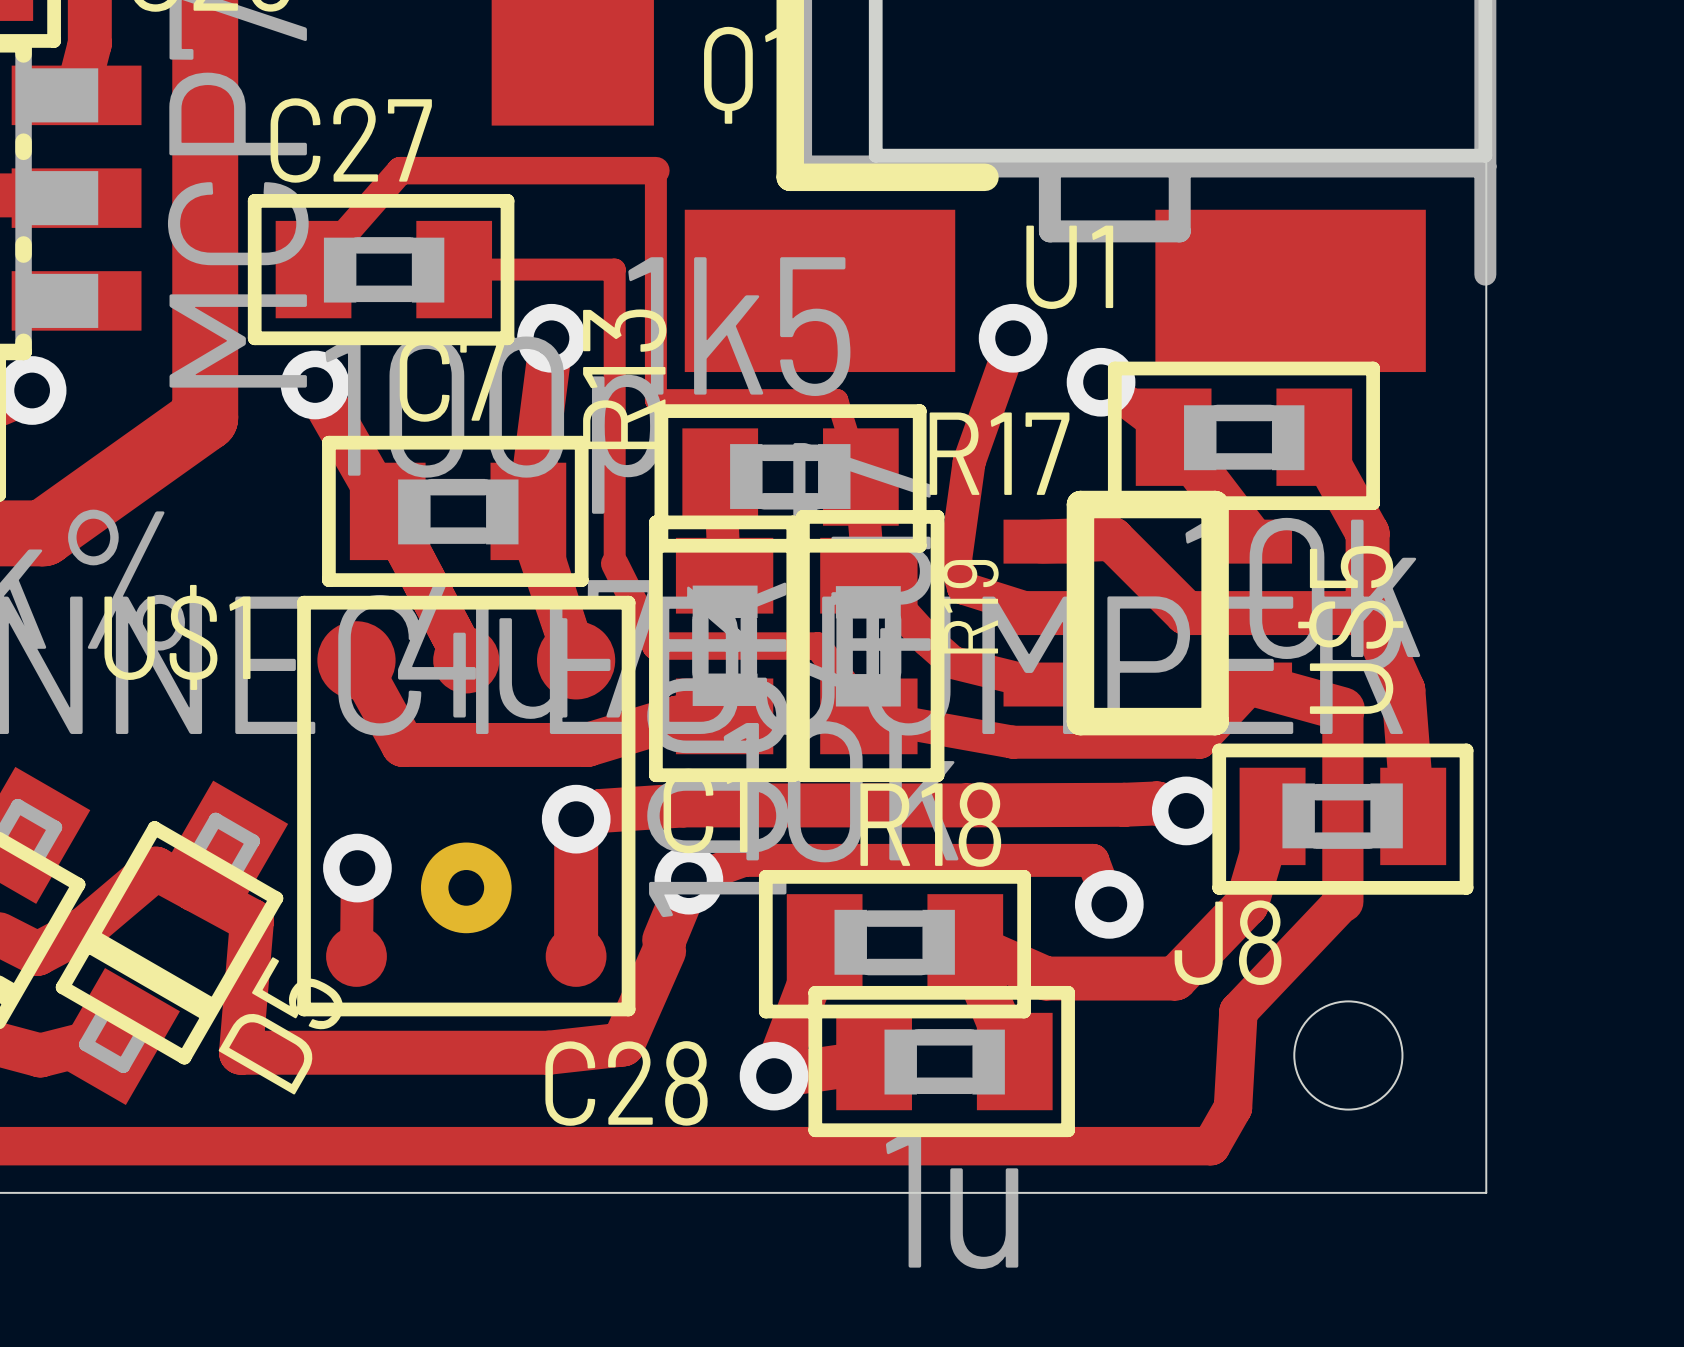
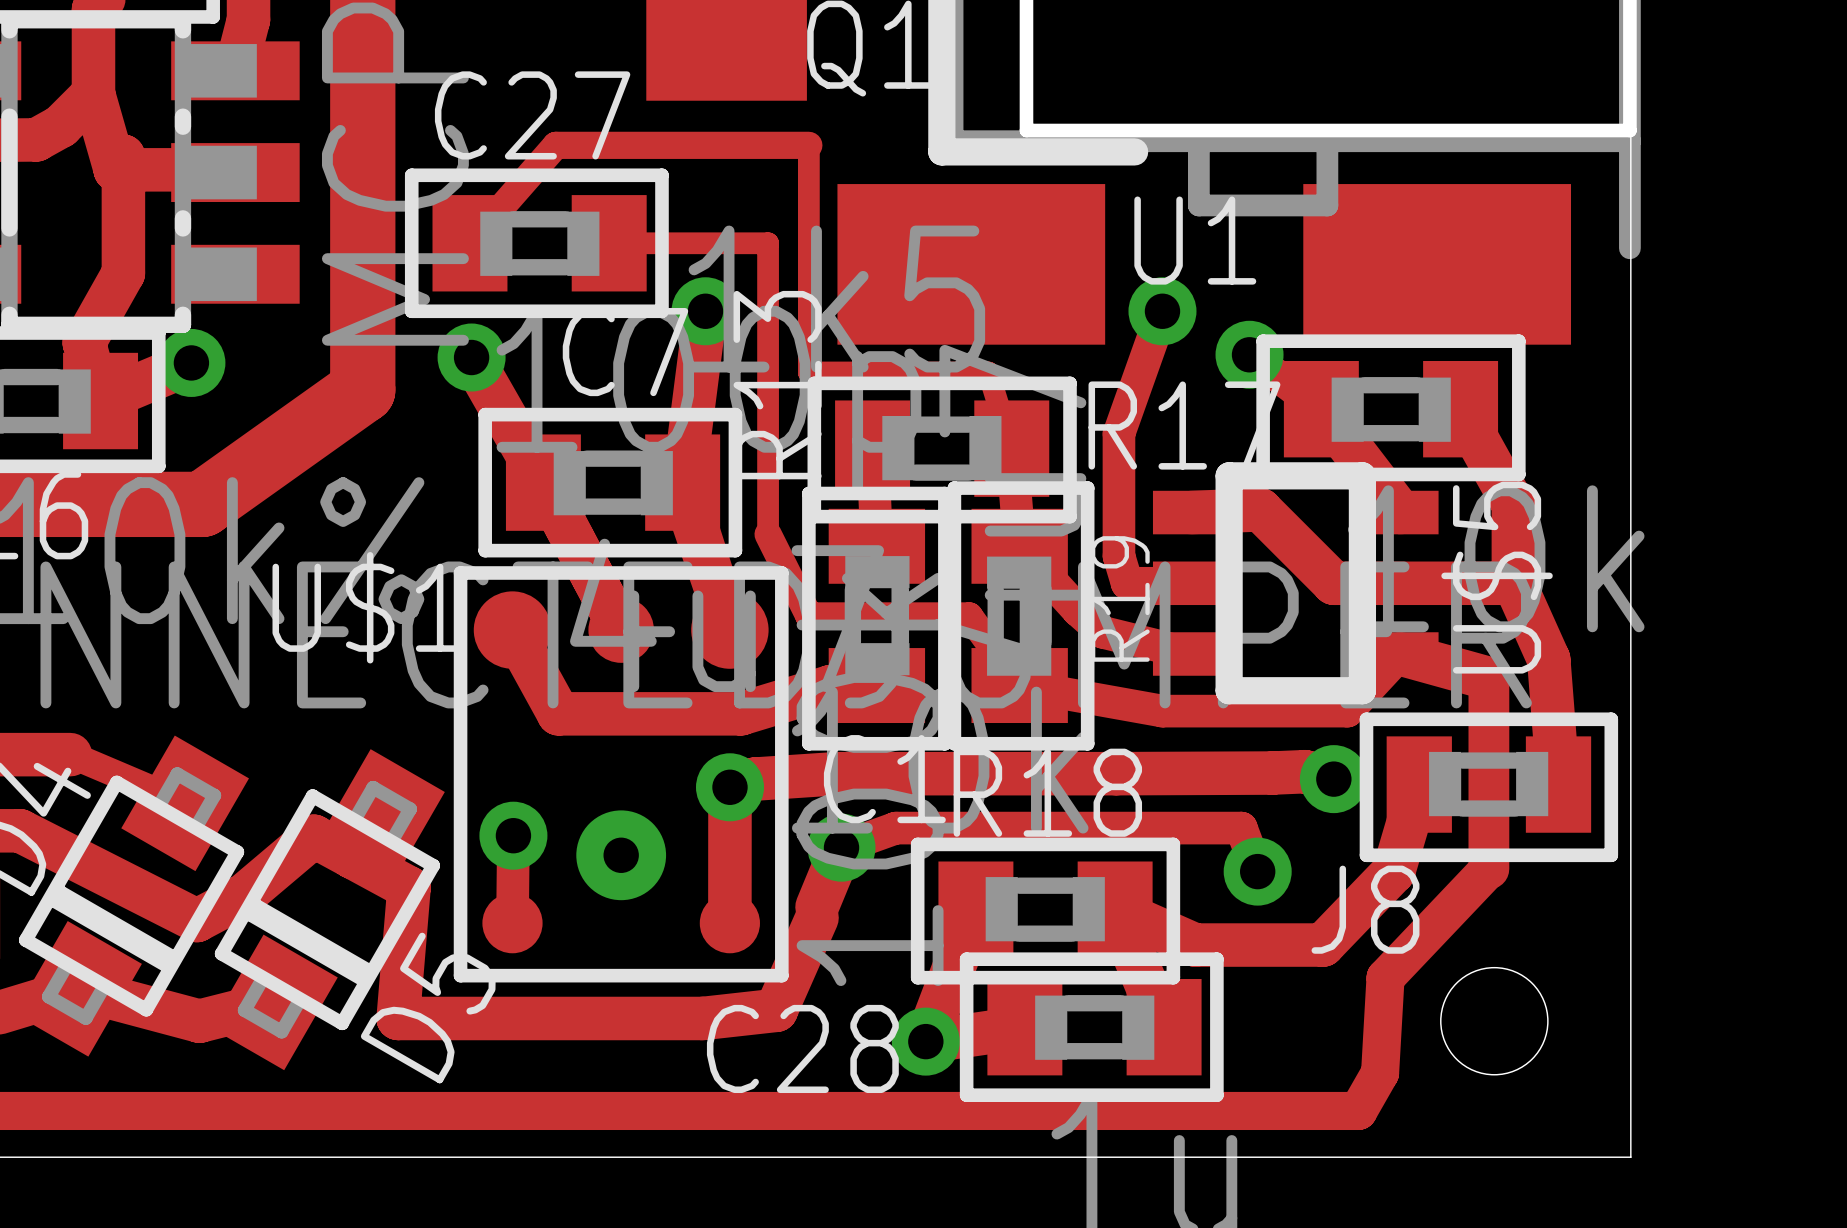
track: (969, 461) (955, 560) (963, 588) (1041, 613) -> (1118, 433) (1118, 556) (1127, 583) (1191, 583)

